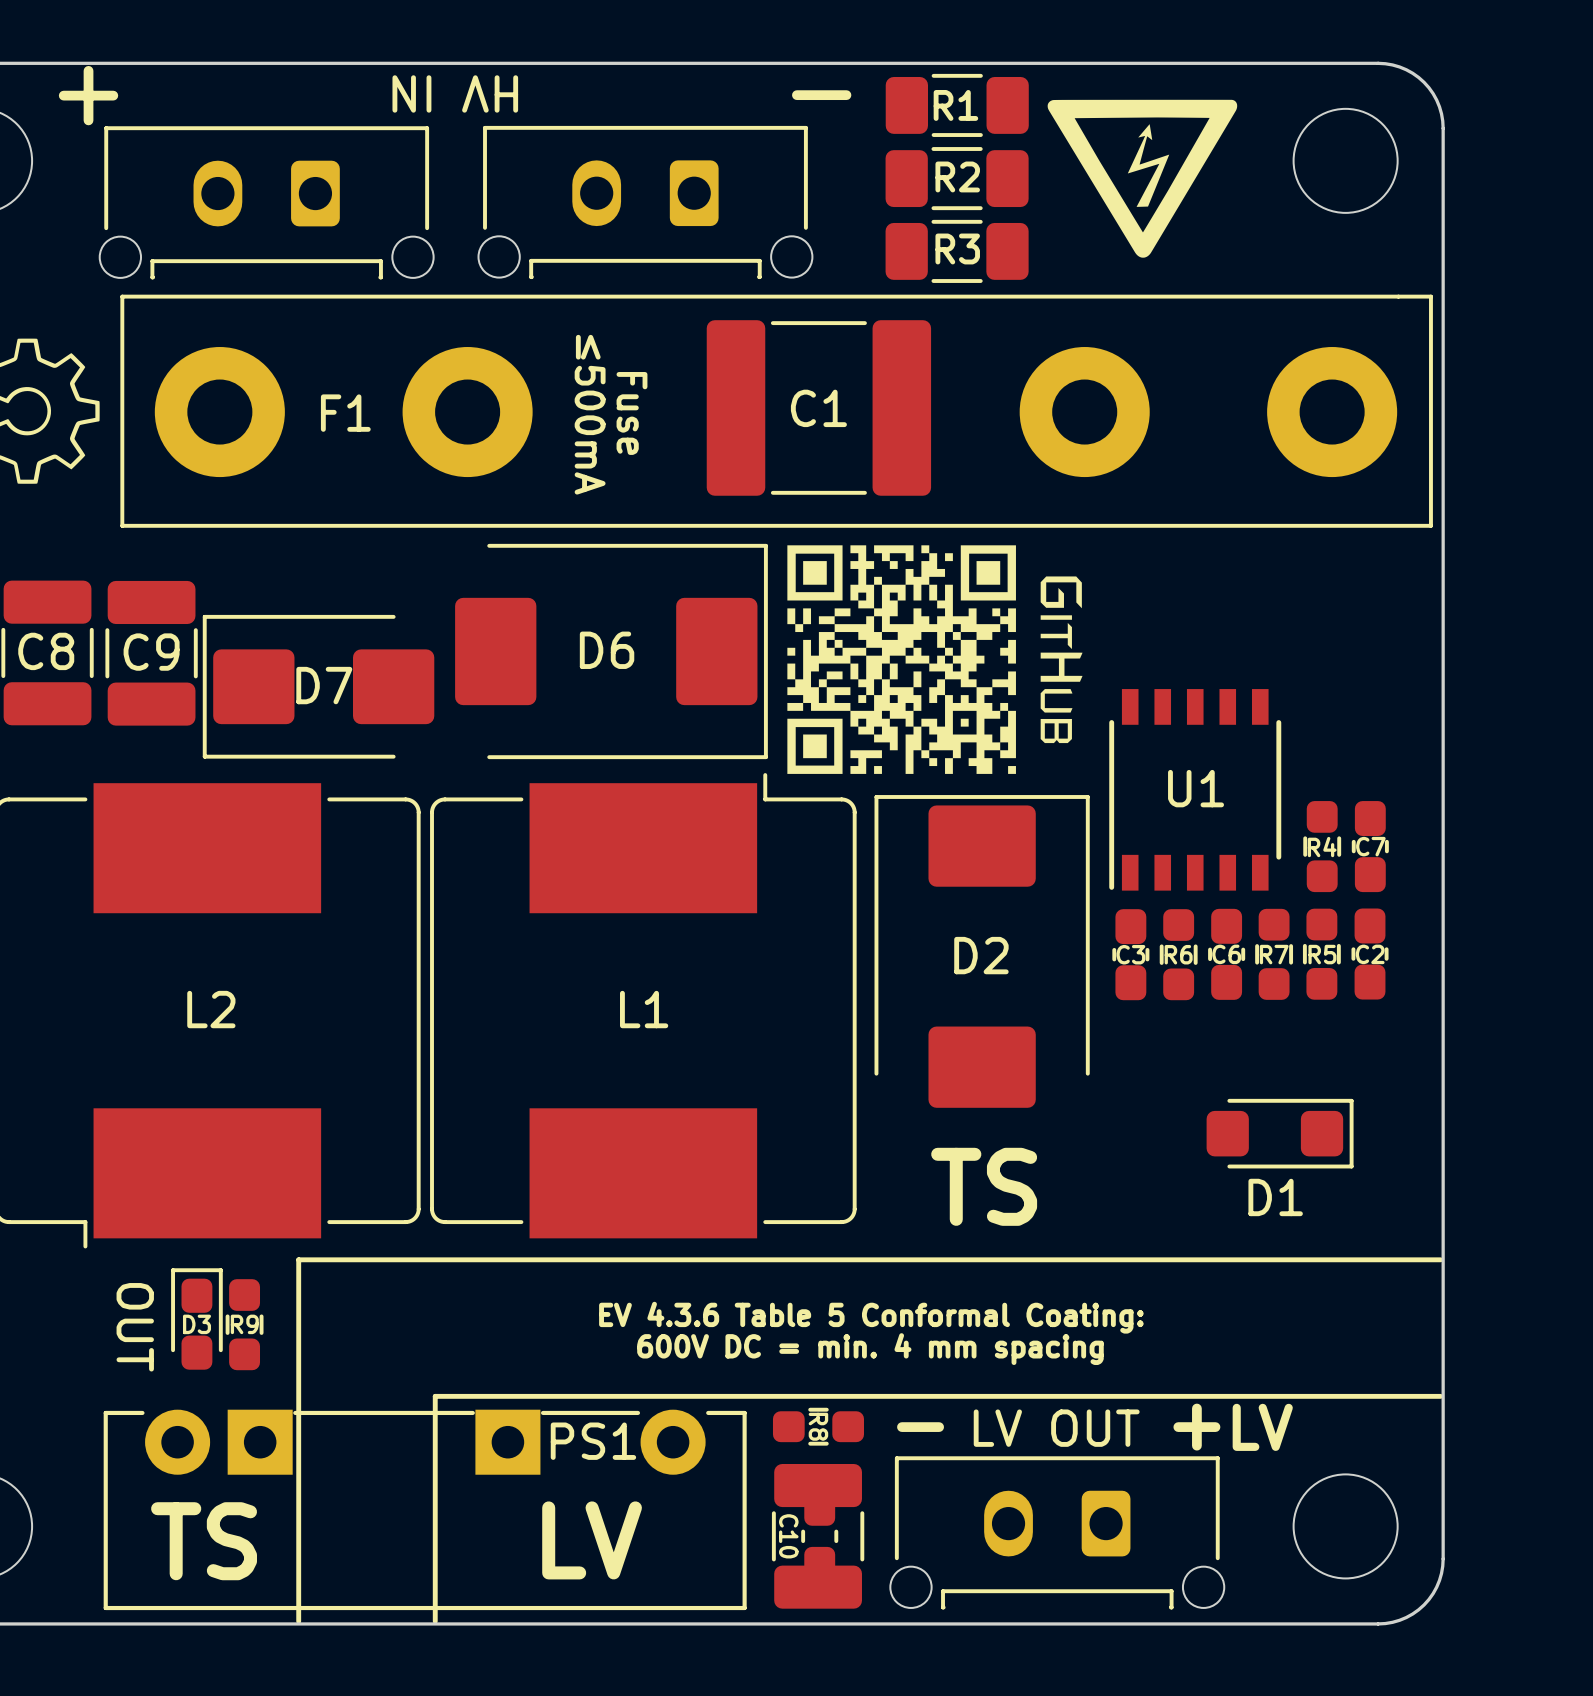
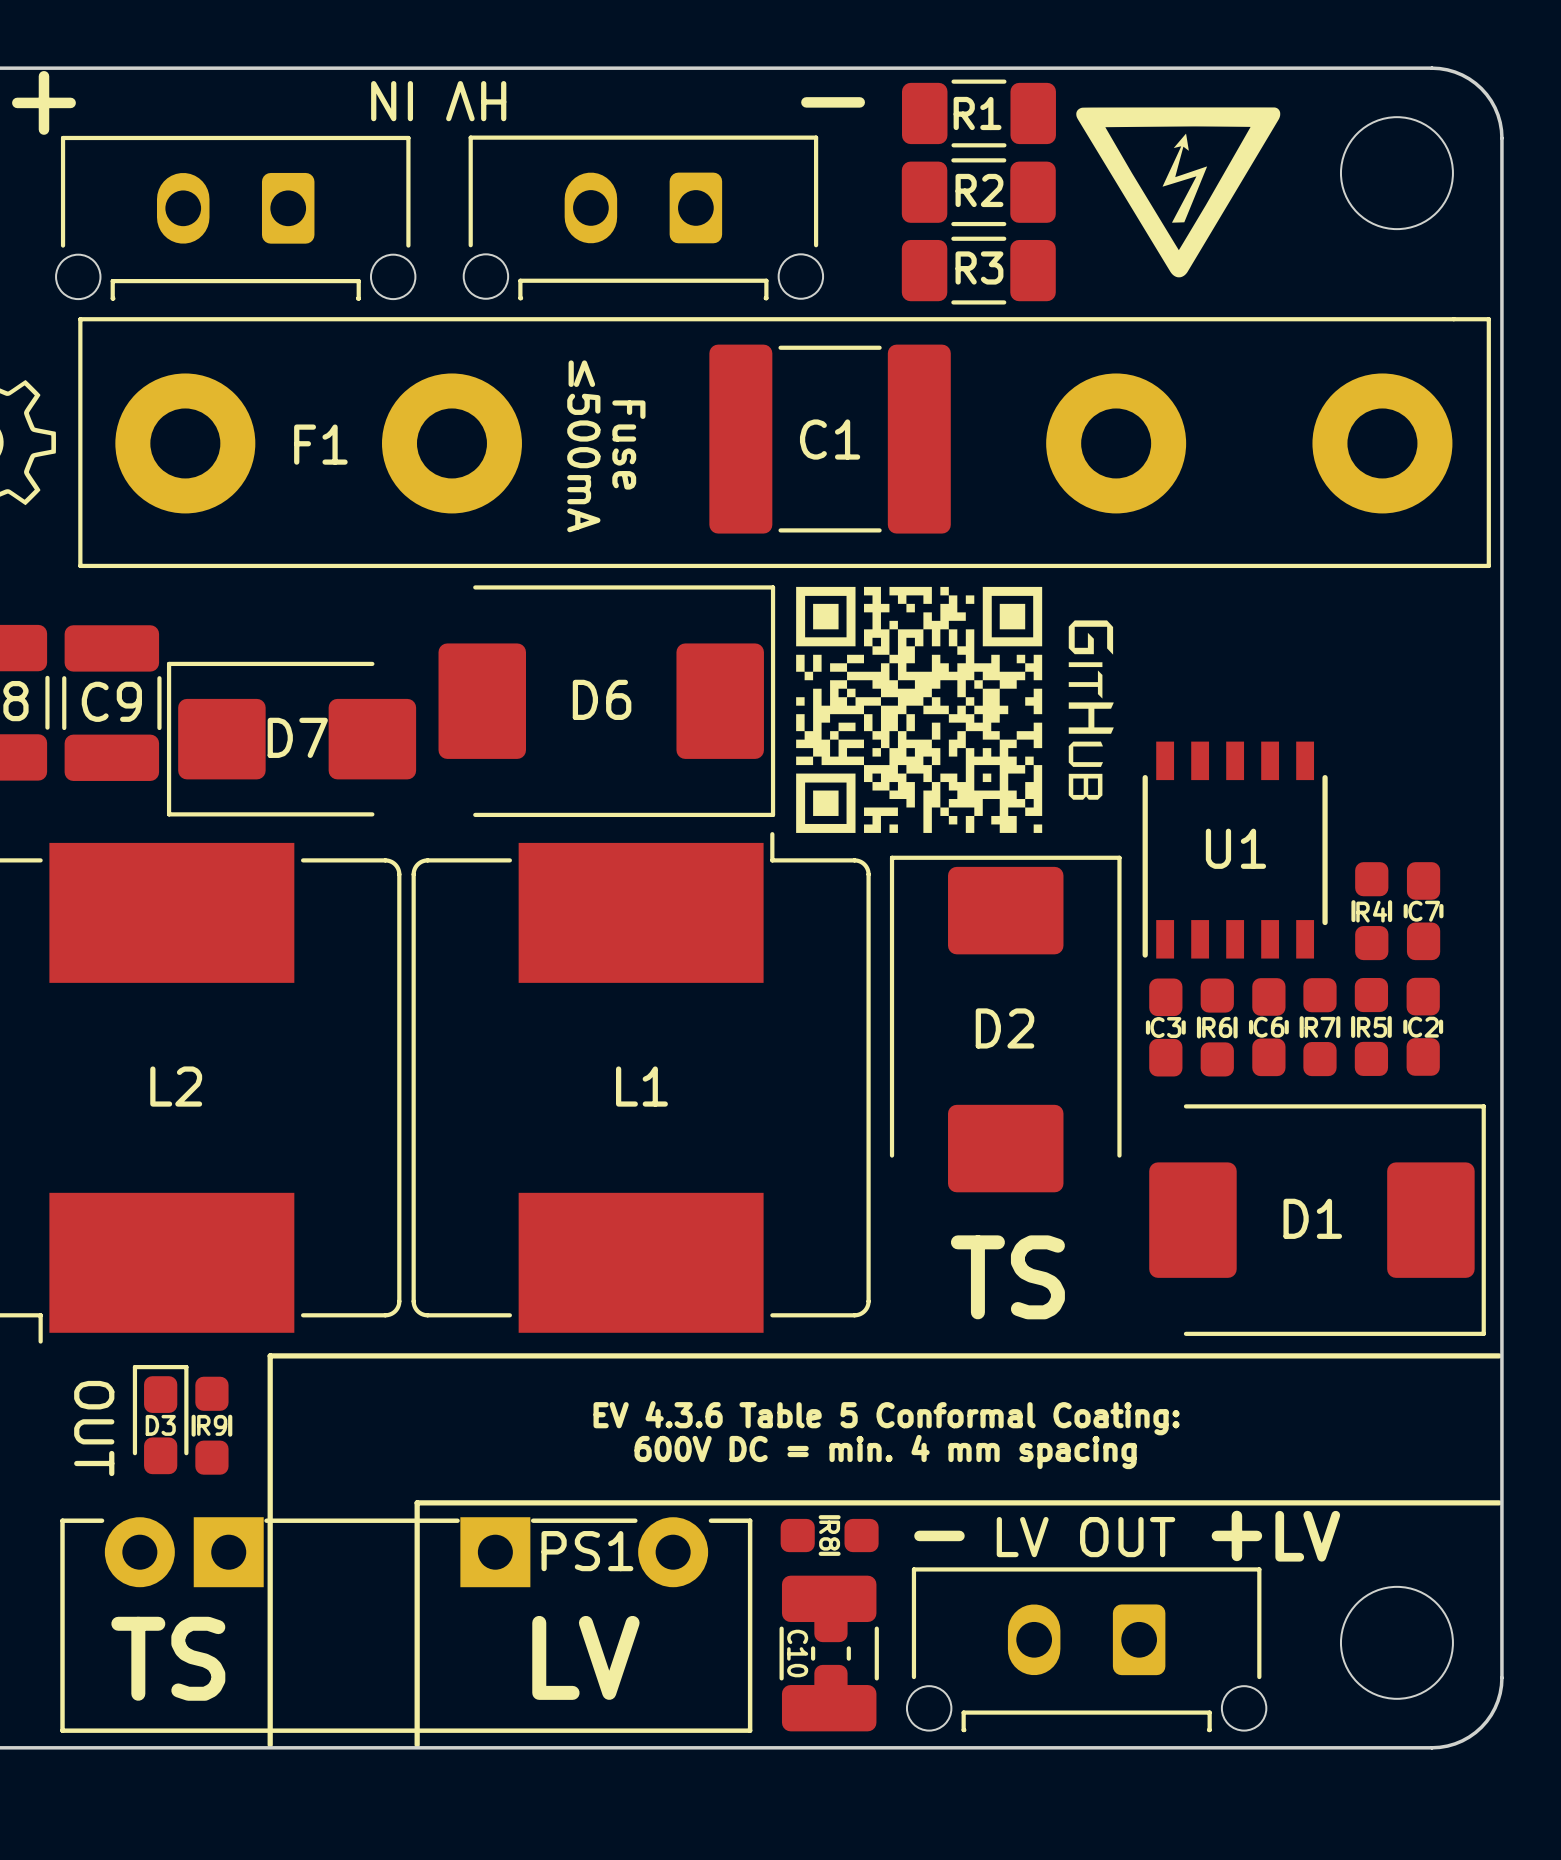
D1 footprint: [1206, 1098, 1354, 1169] -> [1149, 1104, 1486, 1336]

